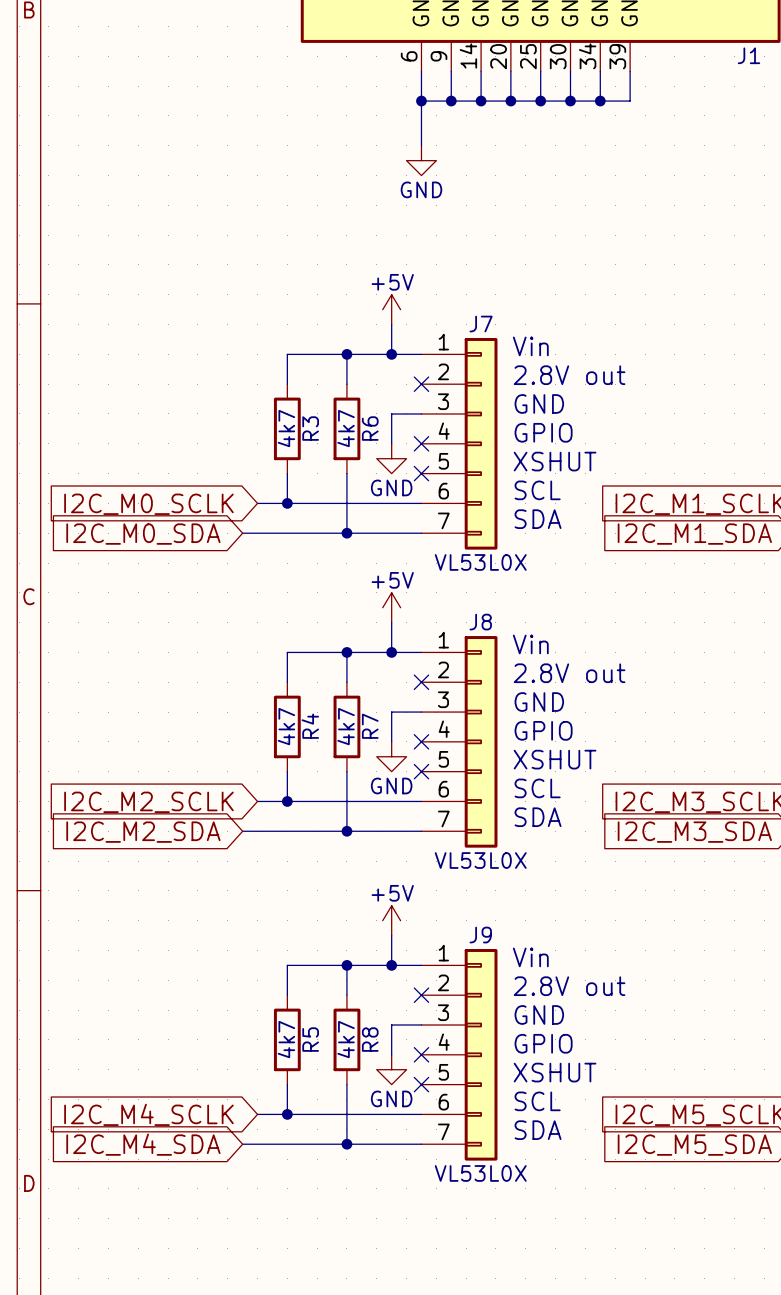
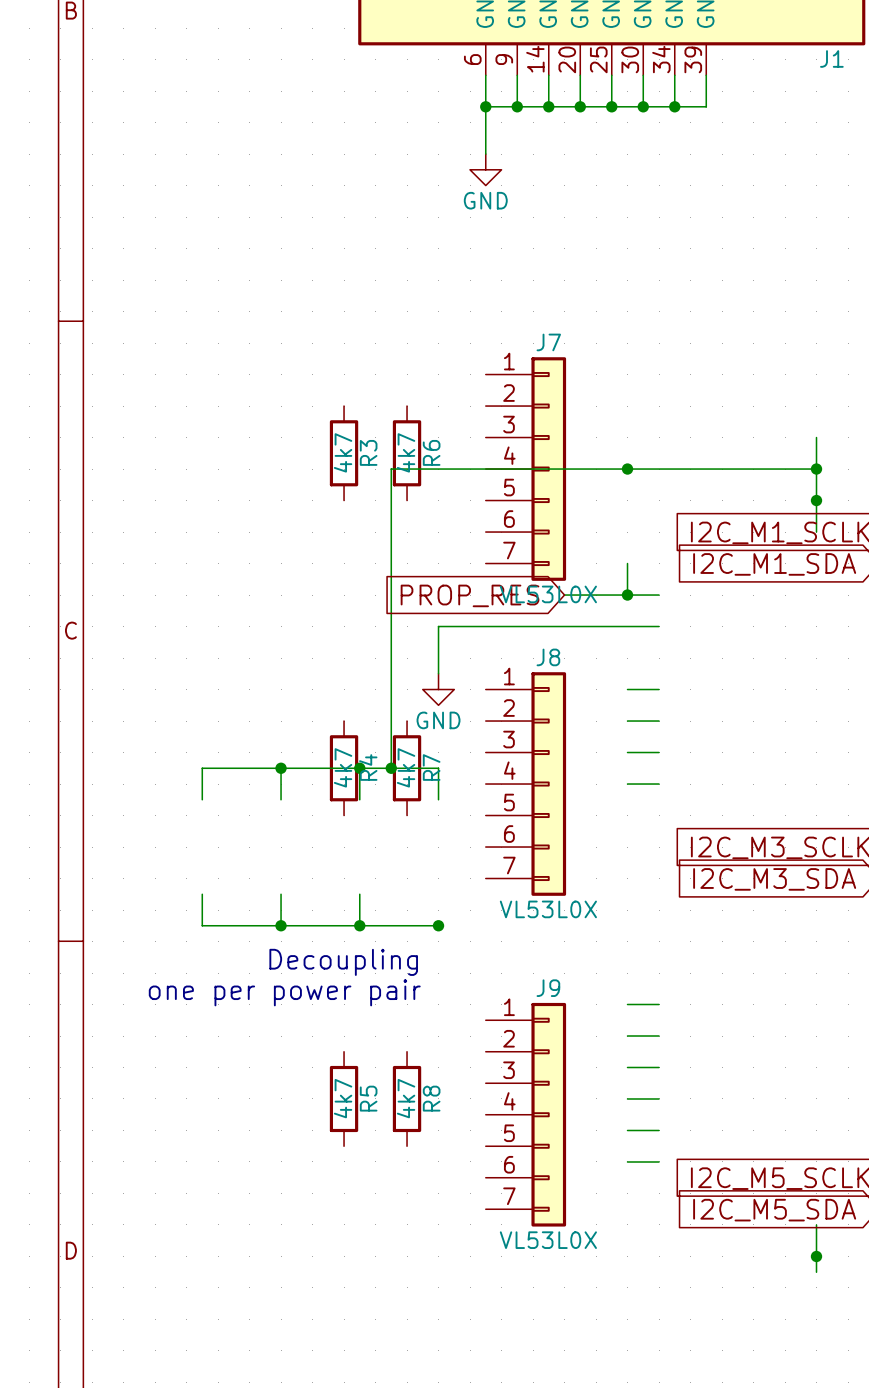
power symbol: +5V (391, 309) -> none
wire: (391, 324) (391, 354) -> none
text: Vin (530, 346) -> none
wire: (346, 354) (346, 384) -> none
junction: (346, 354) -> none
junction: (391, 354) -> none
wire: (421, 354) (287, 354) (287, 384) -> none
text: 2.8V out (569, 375) -> none
no-connect mark: (421, 384) -> none
text: GND (539, 403) -> none
wire: (421, 413) (391, 413) (391, 443) -> none
wire: none -> (816, 437) (816, 532)
text: GPIO (543, 432) -> none
no-connect mark: (421, 443) -> none
junction: none -> (627, 469)
wire: none -> (816, 469) (391, 469) (391, 768)
junction: none -> (816, 469)
power symbol: GND (391, 458) -> none
text: XSHUT (555, 461) -> none
wire: (287, 473) (287, 503) -> none
wire: (346, 473) (346, 533) -> none
no-connect mark: (421, 473) -> none
junction: none -> (816, 500)
text: SCL (537, 490) -> none
wire: (257, 503) (421, 503) -> none
junction: (287, 503) -> none
global label: I2C_M0_SCLK (148, 504) -> none
text: SDA (538, 519) -> none
wire: (242, 533) (421, 533) -> none
junction: (346, 533) -> none
global label: I2C_M0_SDA (143, 534) -> none
global label: none -> PROP_RES (470, 595)
wire: none -> (564, 595) (659, 595)
junction: none -> (627, 595)
wire: none -> (659, 626) (438, 626) (438, 673)
power symbol: +5V (391, 607) -> none
wire: (391, 622) (391, 652) -> (627, 563) (627, 595)
text: Vin (530, 644) -> none
wire: (346, 652) (346, 682) -> (281, 894) (281, 925)
junction: (346, 652) -> none
power symbol: none -> GND (438, 689)
junction: (391, 652) -> none
wire: (421, 652) (287, 652) (287, 682) -> none
wire: none -> (627, 689) (659, 689)
text: 2.8V out (569, 673) -> none
no-connect mark: (421, 682) -> none
wire: none -> (627, 721) (659, 721)
text: GND (539, 702) -> none
wire: (421, 712) (391, 712) (391, 741) -> none
wire: none -> (627, 752) (659, 752)
junction: none -> (281, 768)
junction: none -> (359, 768)
junction: none -> (391, 768)
text: GPIO (543, 730) -> none
no-connect mark: (421, 741) -> none
wire: none -> (627, 784) (659, 784)
wire: none -> (202, 799) (202, 768) (438, 768) (438, 799)
power symbol: GND (391, 756) -> none
text: XSHUT (555, 759) -> none
wire: (287, 771) (287, 801) -> (281, 768) (281, 799)
wire: (346, 771) (346, 831) -> none
no-connect mark: (421, 771) -> none
text: SCL (537, 788) -> none
wire: (257, 801) (421, 801) -> none
junction: (287, 801) -> none
global label: I2C_M2_SCLK (148, 802) -> none
text: SDA (538, 817) -> none
wire: (242, 831) (421, 831) -> none
junction: (346, 831) -> none
global label: I2C_M2_SDA (143, 832) -> none
wire: none -> (202, 894) (202, 925) (438, 925)
junction: none -> (281, 925)
junction: none -> (359, 925)
junction: none -> (438, 925)
text: none -> Decoupling (343, 962)
power symbol: +5V (391, 920) -> none
wire: (391, 935) (391, 965) -> (359, 894) (359, 925)
text: none -> one per power pair (284, 992)
wire: none -> (627, 1004) (659, 1004)
text: Vin (530, 957) -> none
wire: (346, 965) (346, 995) -> (359, 768) (359, 799)
junction: (346, 965) -> none
junction: (391, 965) -> none
wire: (421, 965) (287, 965) (287, 995) -> none
wire: none -> (627, 1036) (659, 1036)
text: 2.8V out (569, 986) -> none
no-connect mark: (421, 995) -> none
wire: none -> (627, 1067) (659, 1067)
text: GND (539, 1014) -> none
wire: (421, 1025) (391, 1025) (391, 1054) -> none
wire: none -> (627, 1098) (659, 1098)
text: GPIO (543, 1043) -> none
no-connect mark: (421, 1054) -> none
power symbol: GND (391, 1069) -> none
wire: none -> (627, 1130) (659, 1130)
text: XSHUT (555, 1072) -> none
wire: (287, 1084) (287, 1114) -> none
wire: (346, 1084) (346, 1144) -> none
no-connect mark: (421, 1084) -> none
wire: none -> (627, 1161) (659, 1161)
text: SCL (537, 1101) -> none
global label: I2C_M4_SCLK (148, 1114) -> none
wire: (257, 1114) (421, 1114) -> none
junction: (287, 1114) -> none
text: SDA (538, 1130) -> none
global label: I2C_M4_SDA (143, 1144) -> none
wire: (242, 1144) (421, 1144) -> none
junction: (346, 1144) -> none
wire: none -> (816, 1224) (816, 1272)
junction: none -> (816, 1256)

